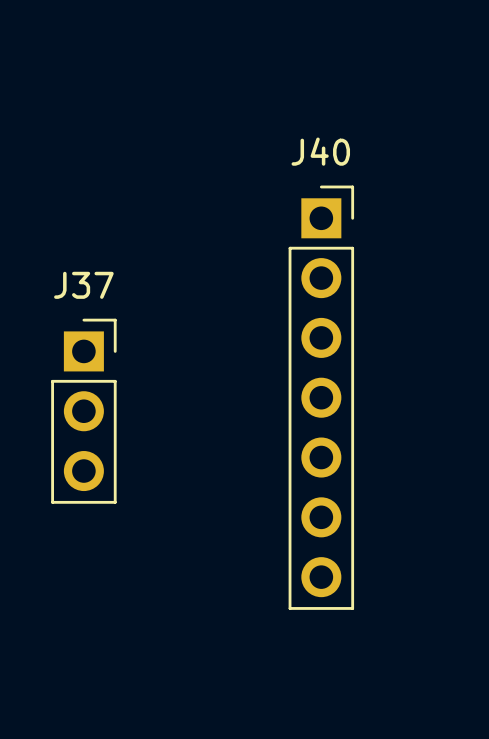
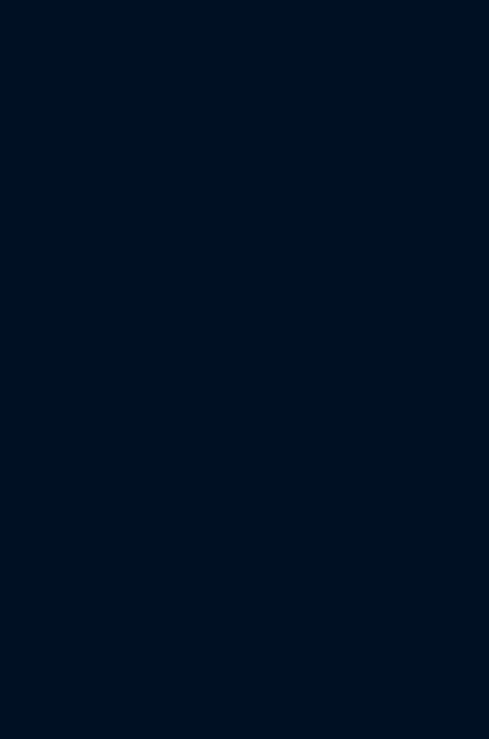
J40: (321, 397) -> none
J37: (83, 411) -> none

